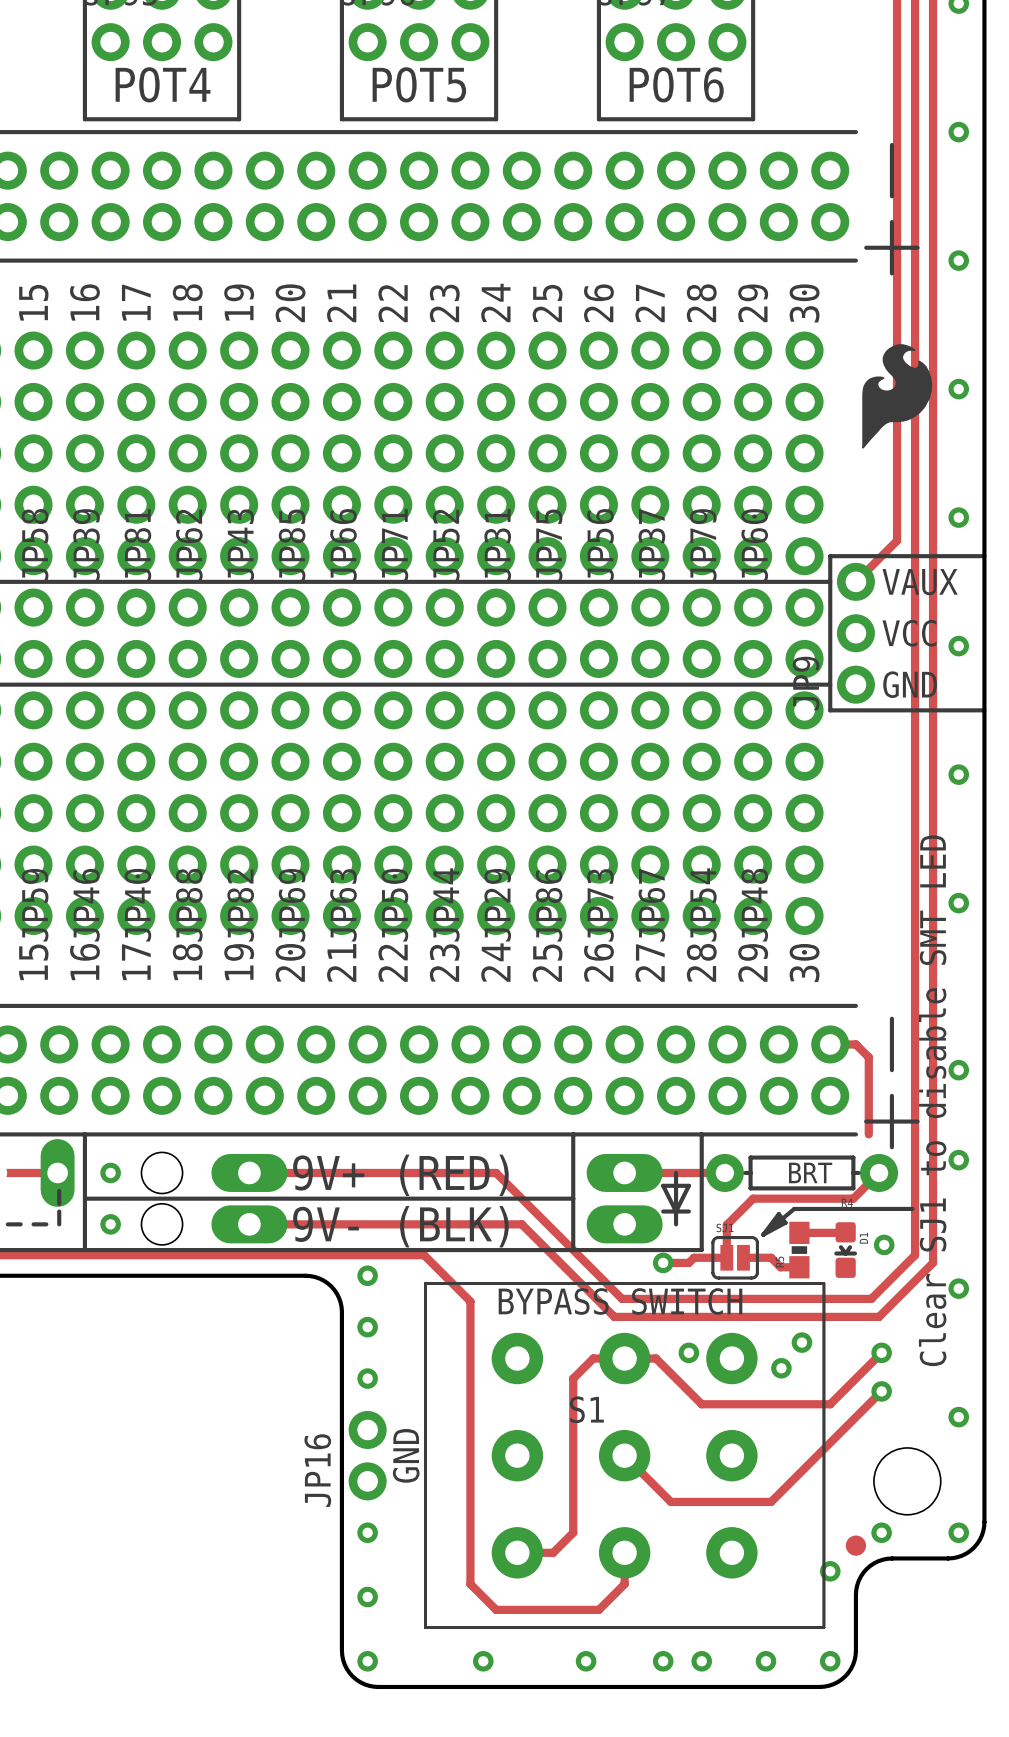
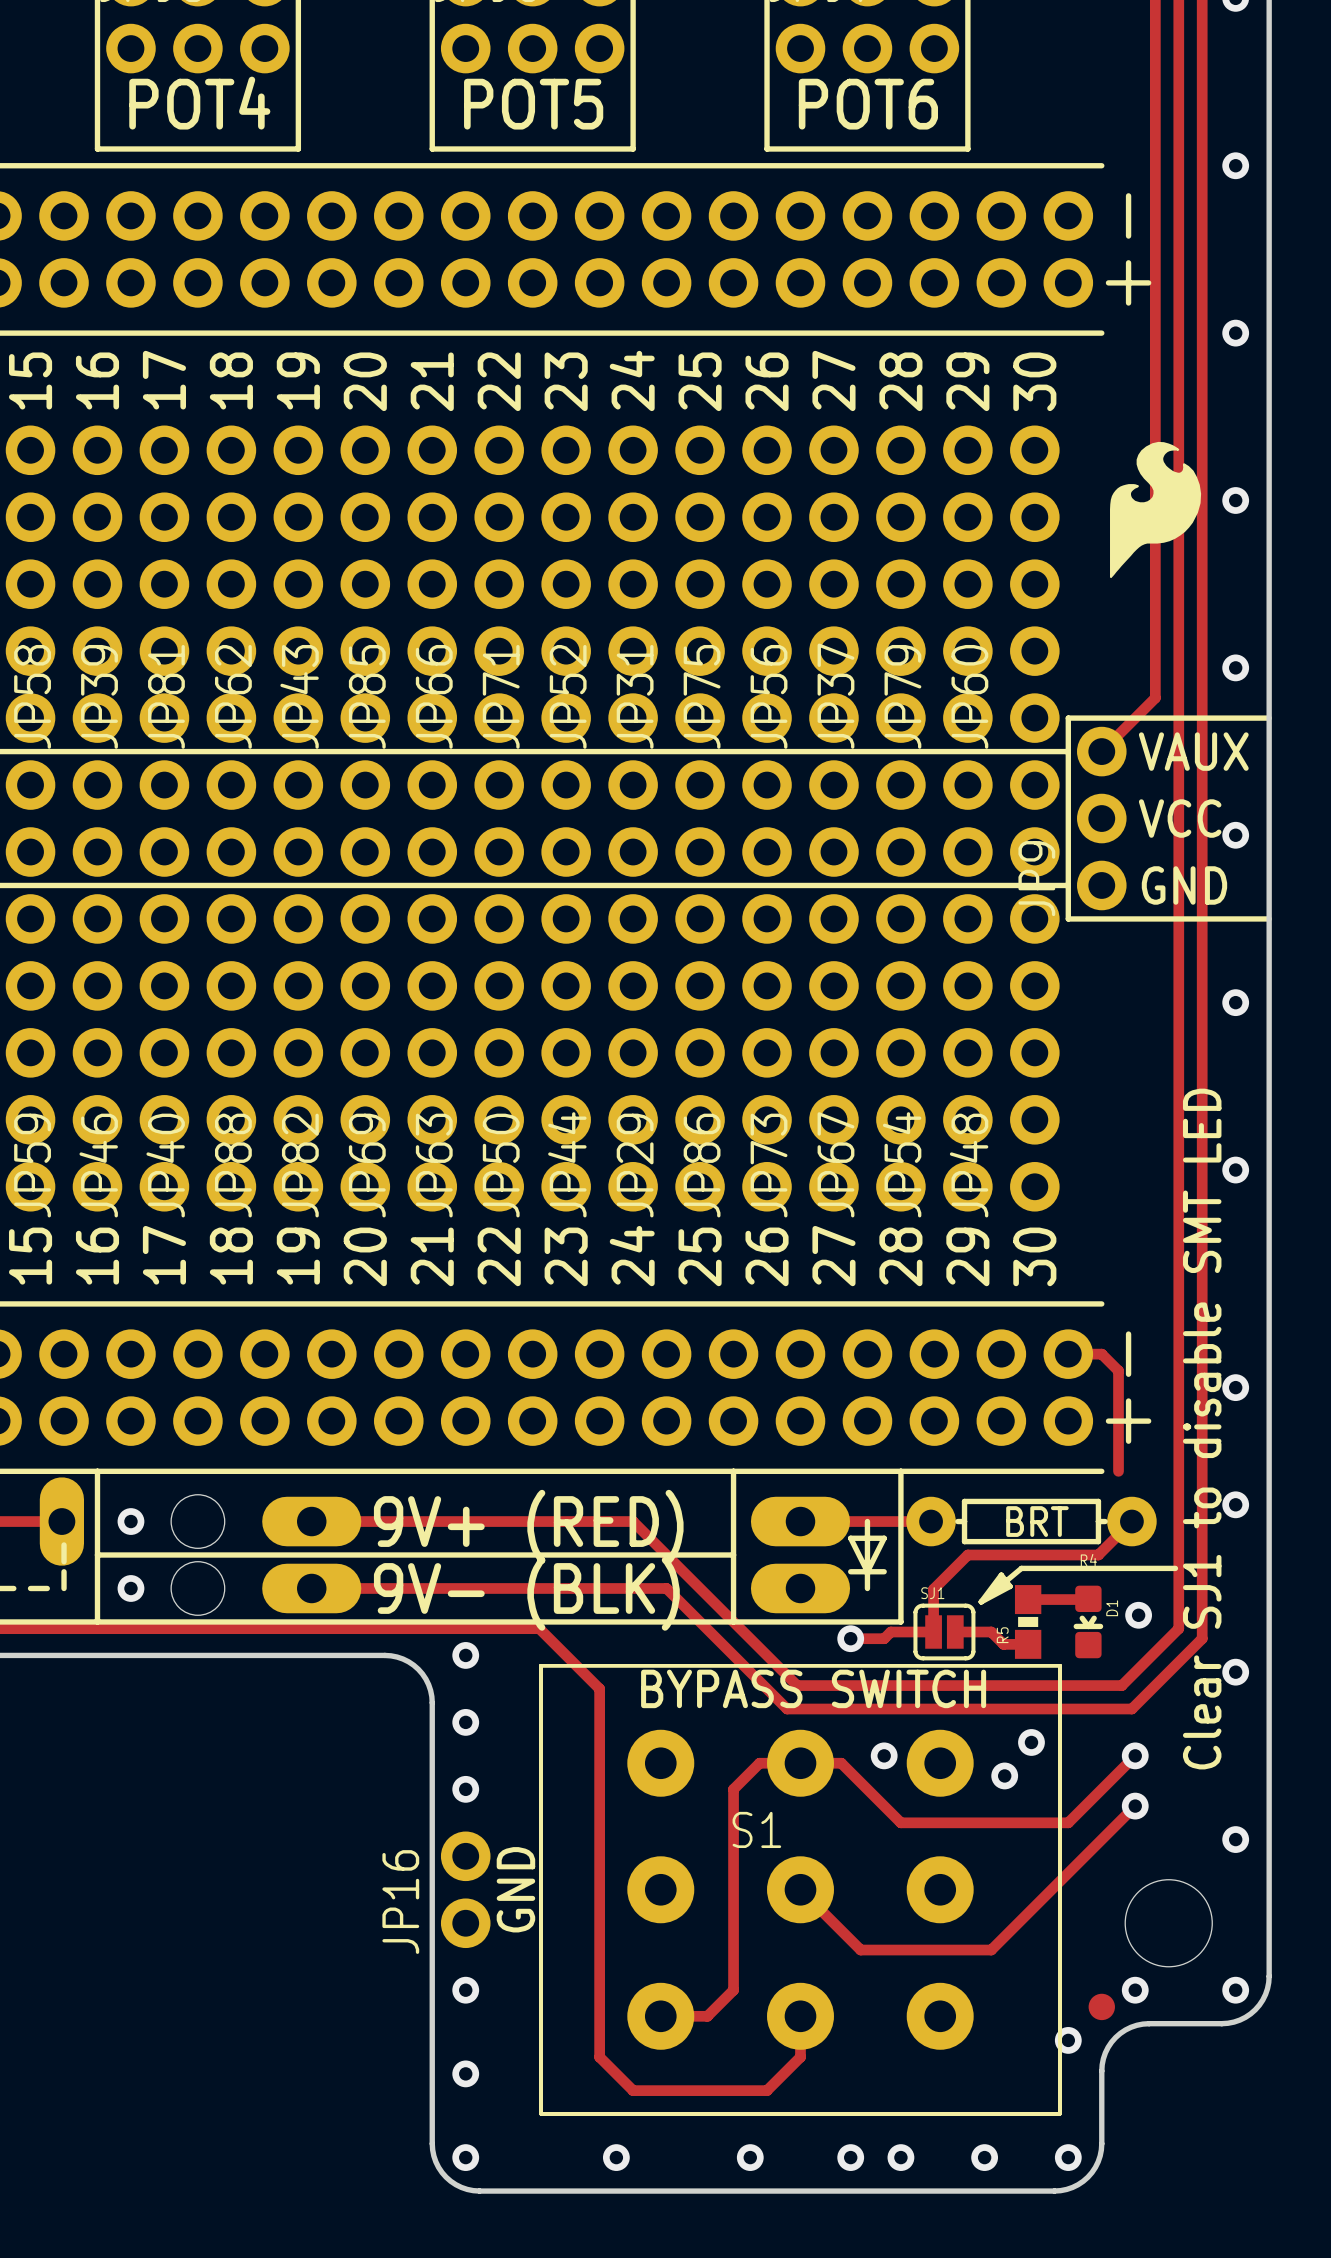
line: (891, 144) (891, 196) -> none
line: none -> (1128, 195) (1128, 236)
line: none -> (1128, 262) (1128, 302)
line: (891, 222) (891, 273) -> (1148, 282) (1108, 282)
line: (866, 247) (917, 247) -> none
line: (891, 1018) (891, 1070) -> none
line: none -> (1128, 1334) (1128, 1374)
line: none -> (1128, 1401) (1128, 1441)
line: (891, 1095) (891, 1147) -> (1148, 1421) (1108, 1421)
line: (866, 1121) (917, 1121) -> none

